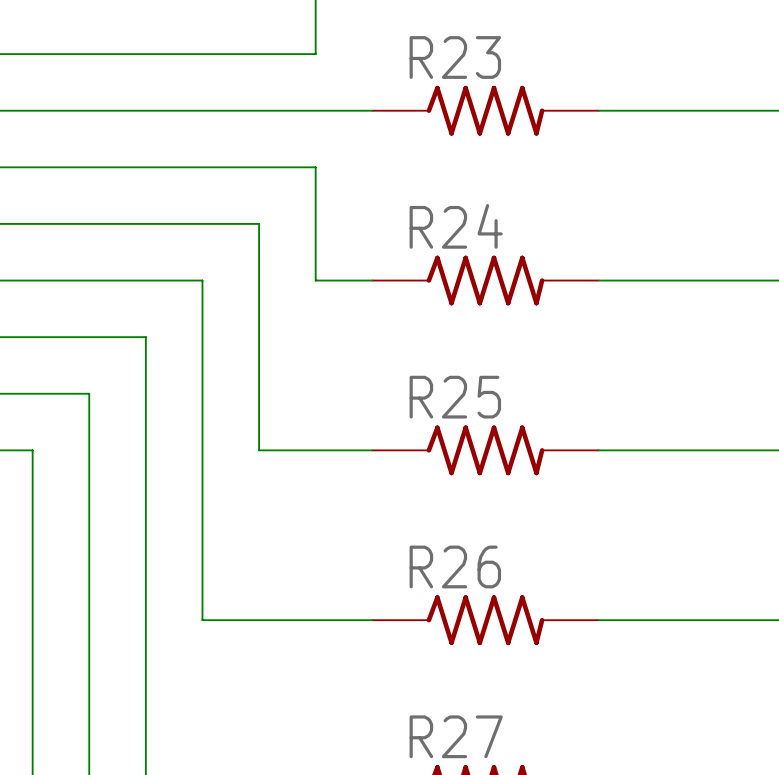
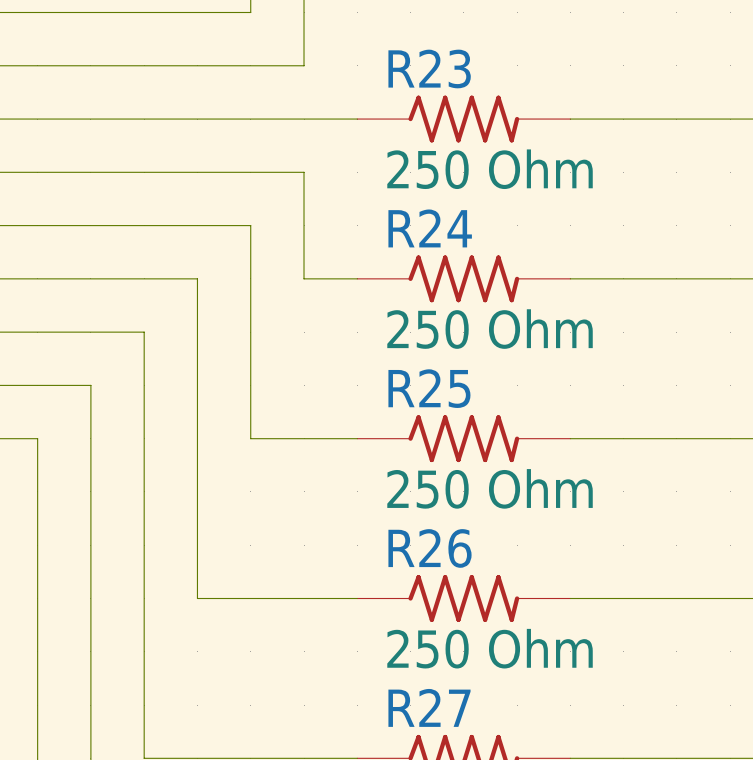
R23 value: none -> 250 Ohm (490, 169)
R24 value: none -> 250 Ohm (490, 329)
R25 value: none -> 250 Ohm (490, 488)
R26 value: none -> 250 Ohm (490, 648)

